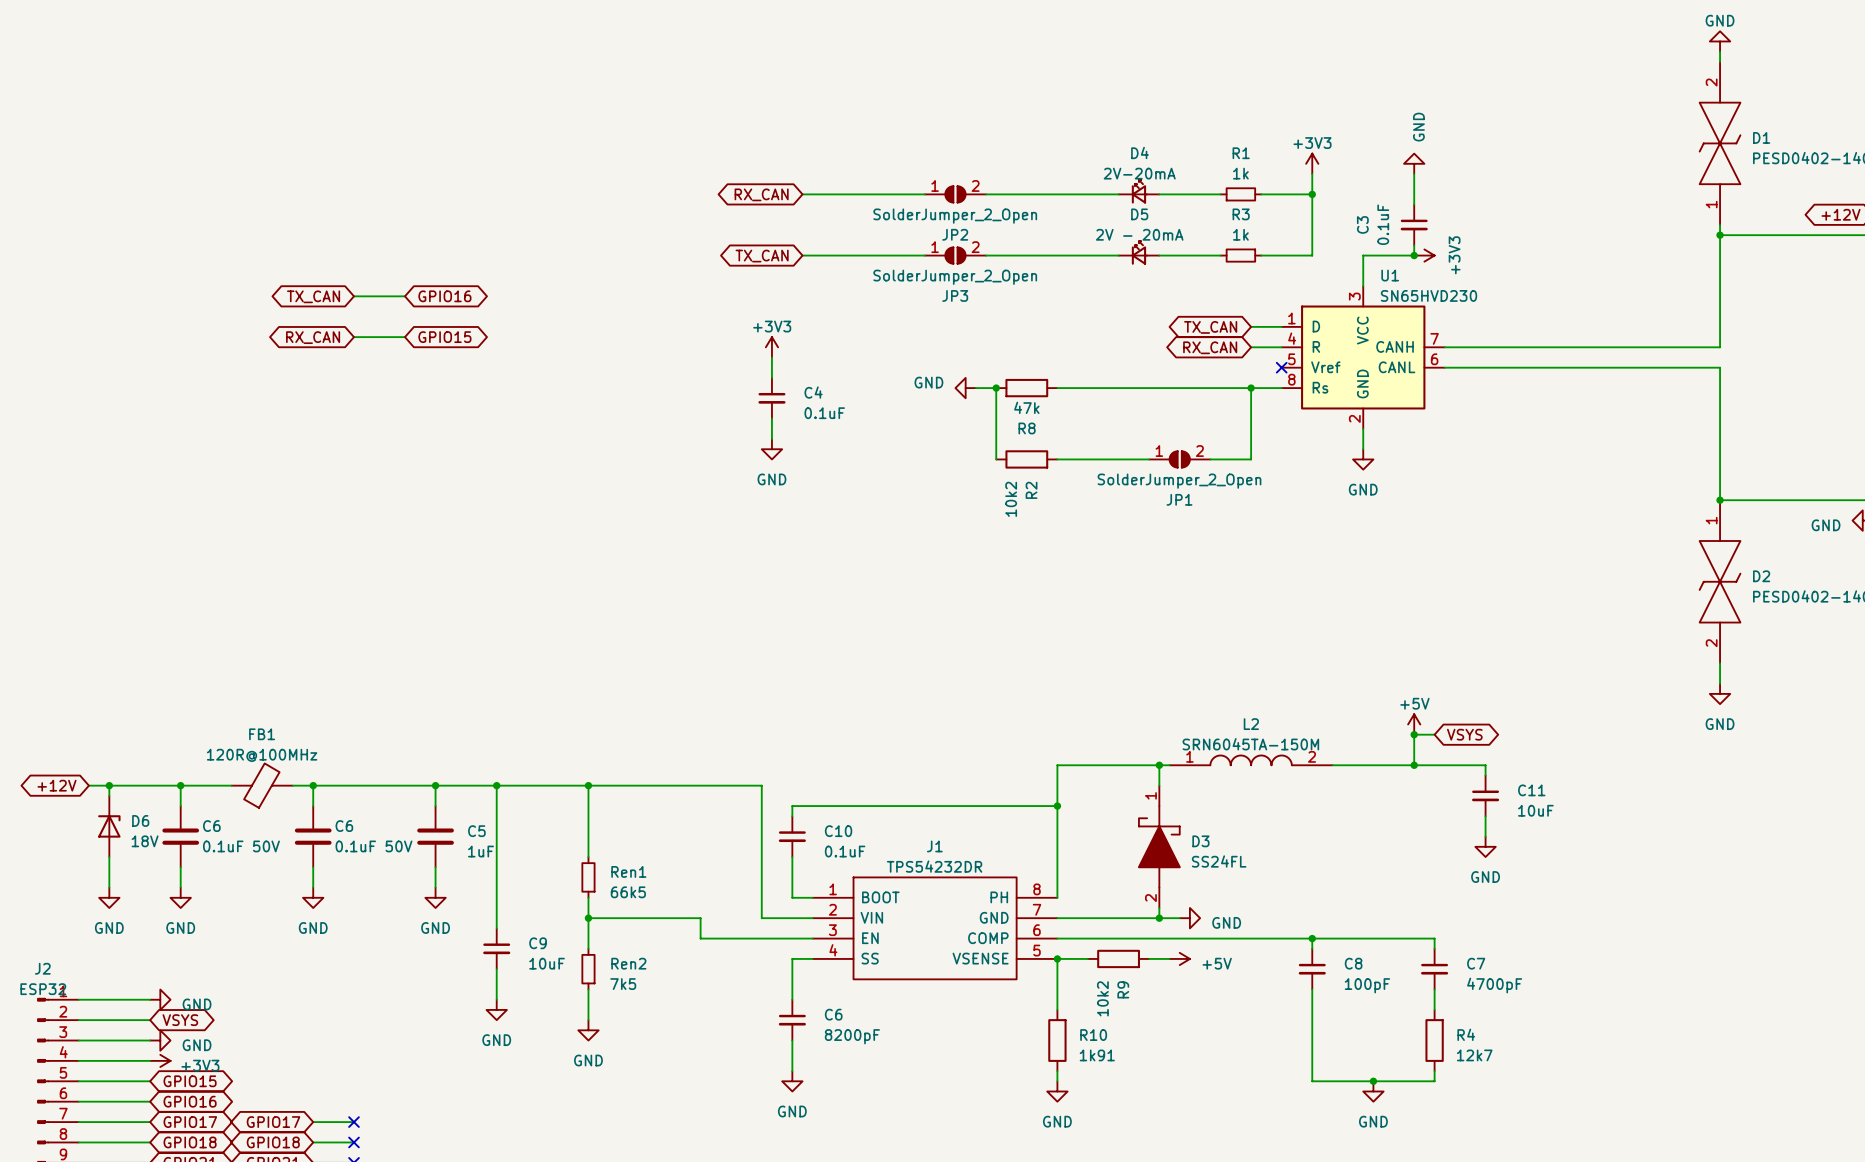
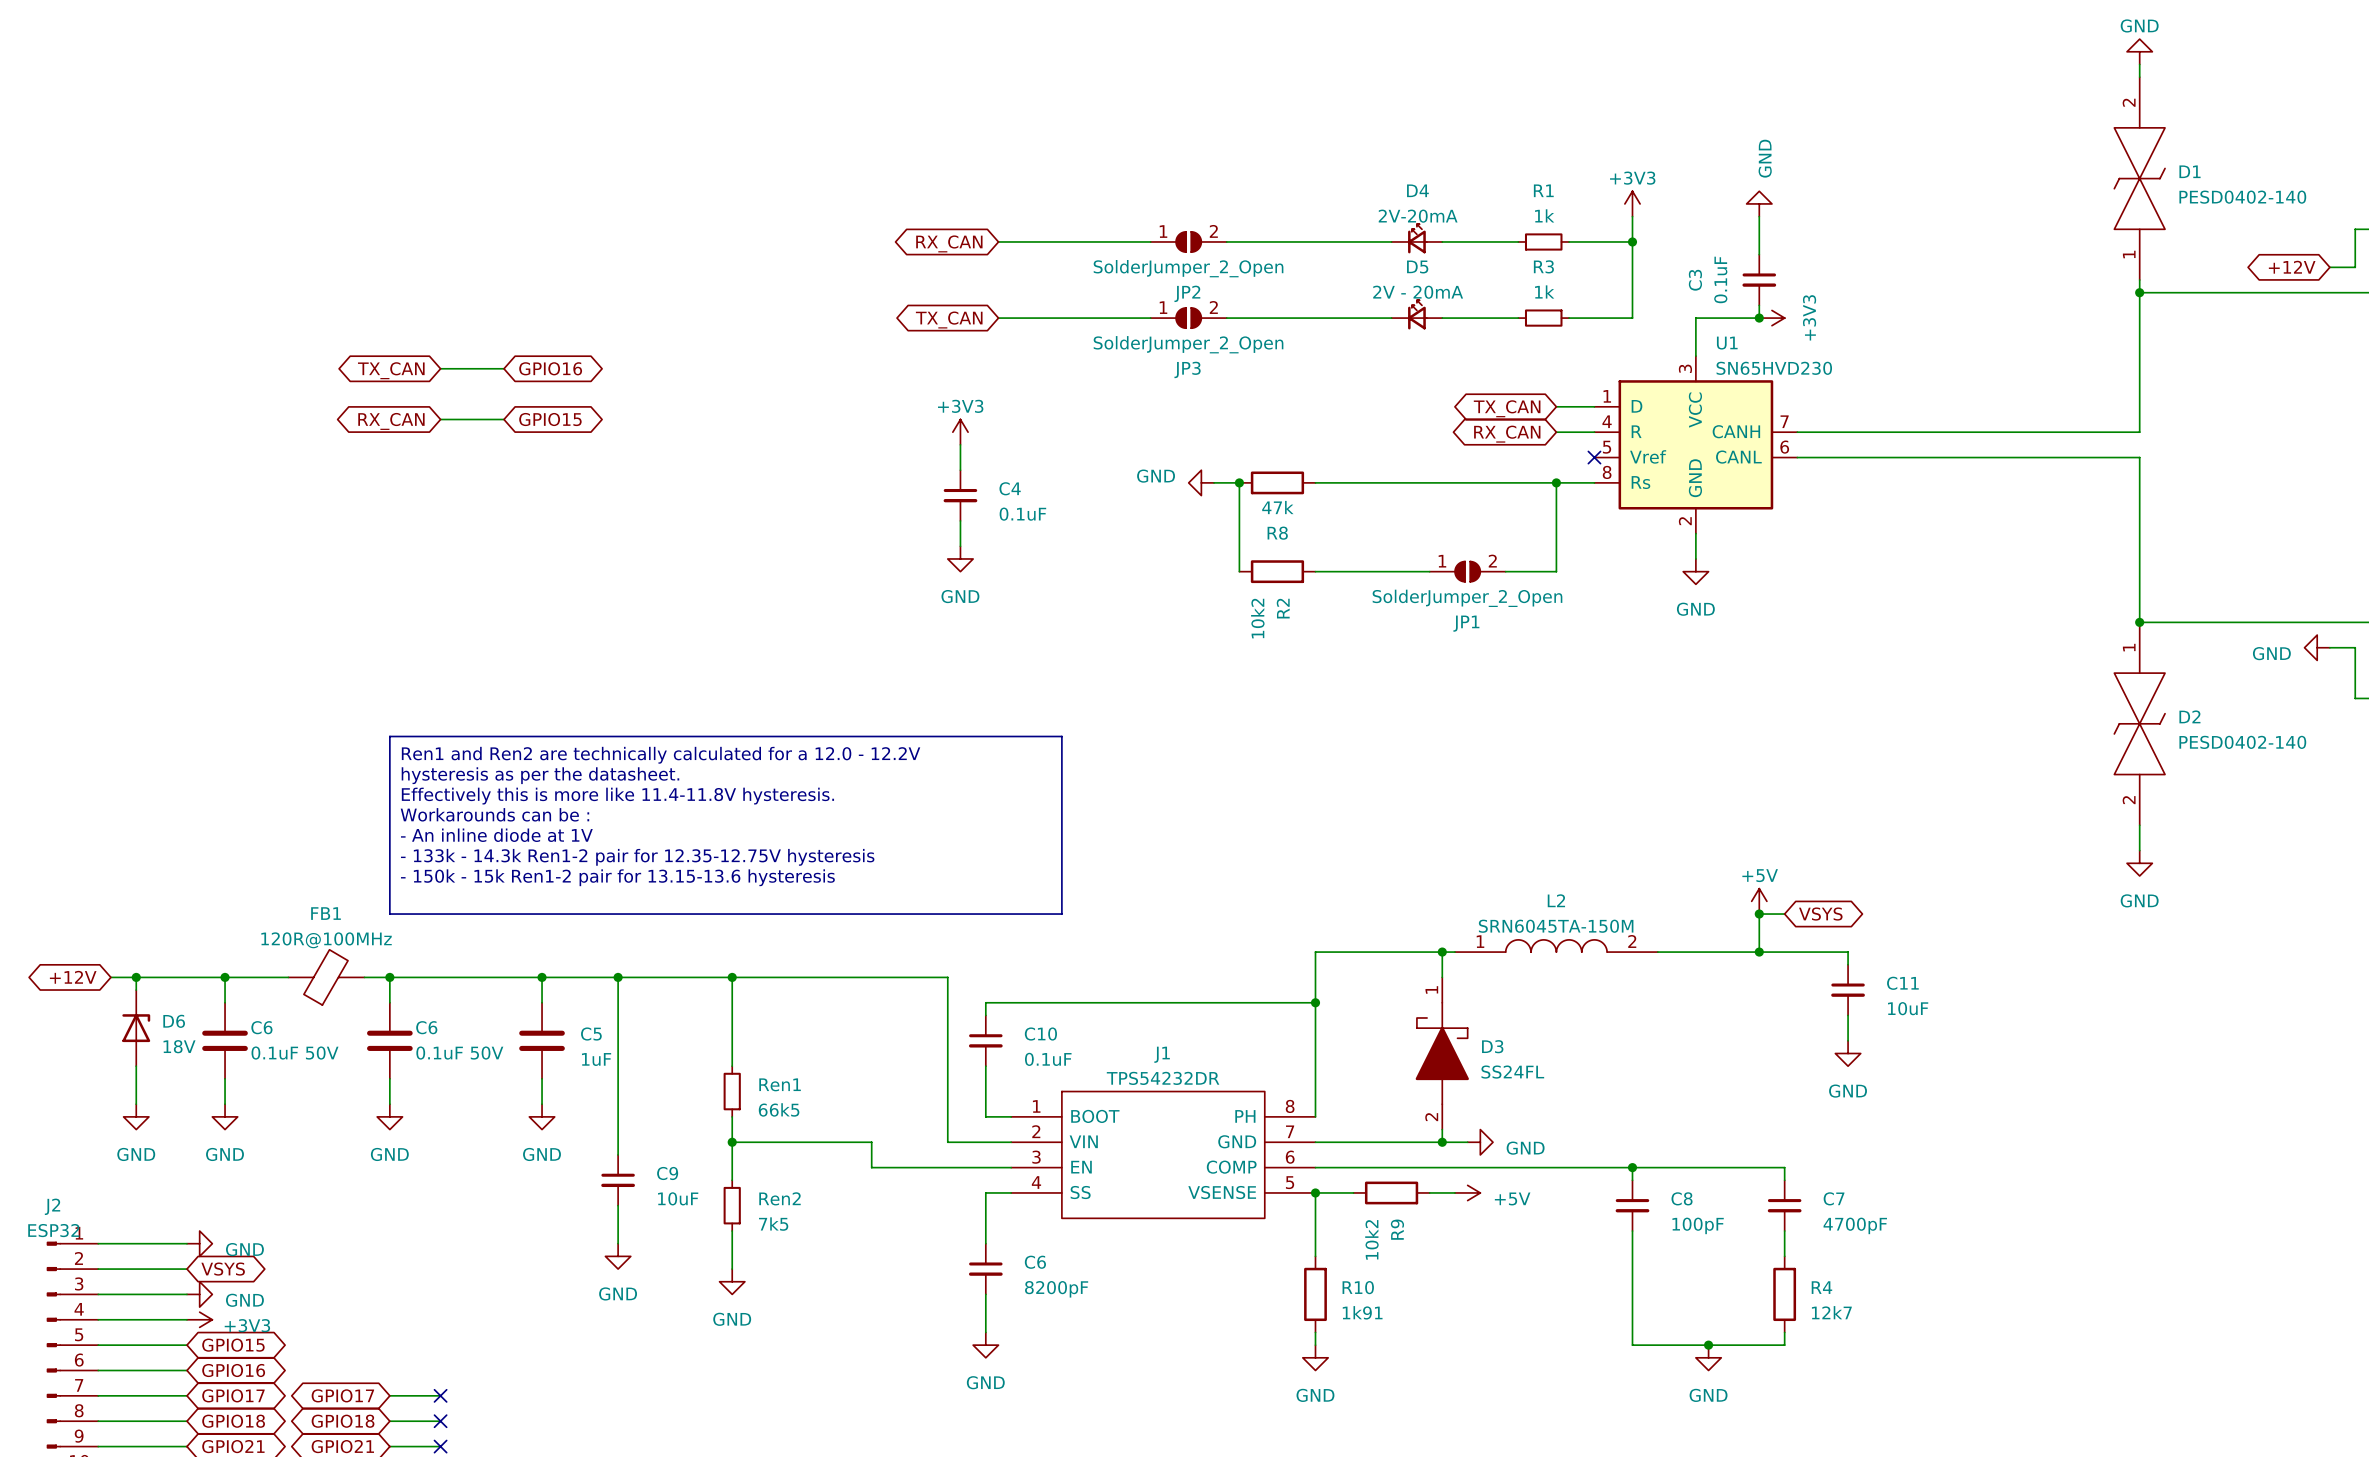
line: none -> (389, 736) (1061, 736) (1061, 914) (389, 914) (389, 736)
text: none -> Ren1 and Ren2 are technically calculated for a 12.0 - 12.2V (661, 755)
text: none -> hysteresis as per the datasheet. (540, 775)
text: none -> Effectively this is more like 11.4-11.8V hysteresis. (617, 796)
text: none -> Workarounds can be : (494, 814)
text: none -> - An inline diode at 1V (496, 835)
text: none -> - 133k - 14.3k Ren1-2 pair for 12.35-12.75V hysteresis (637, 857)
text: none -> - 150k - 15k Ren1-2 pair for 13.15-13.6 hysteresis (617, 877)

